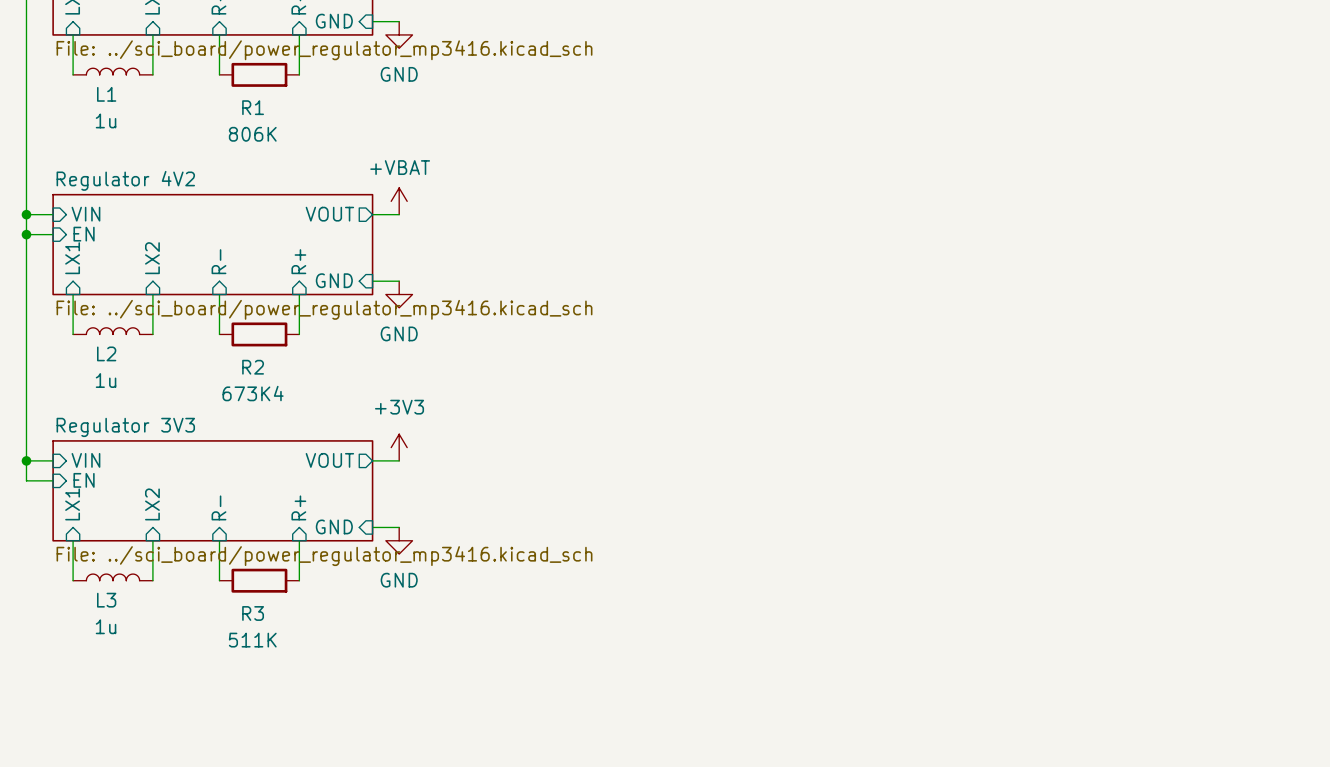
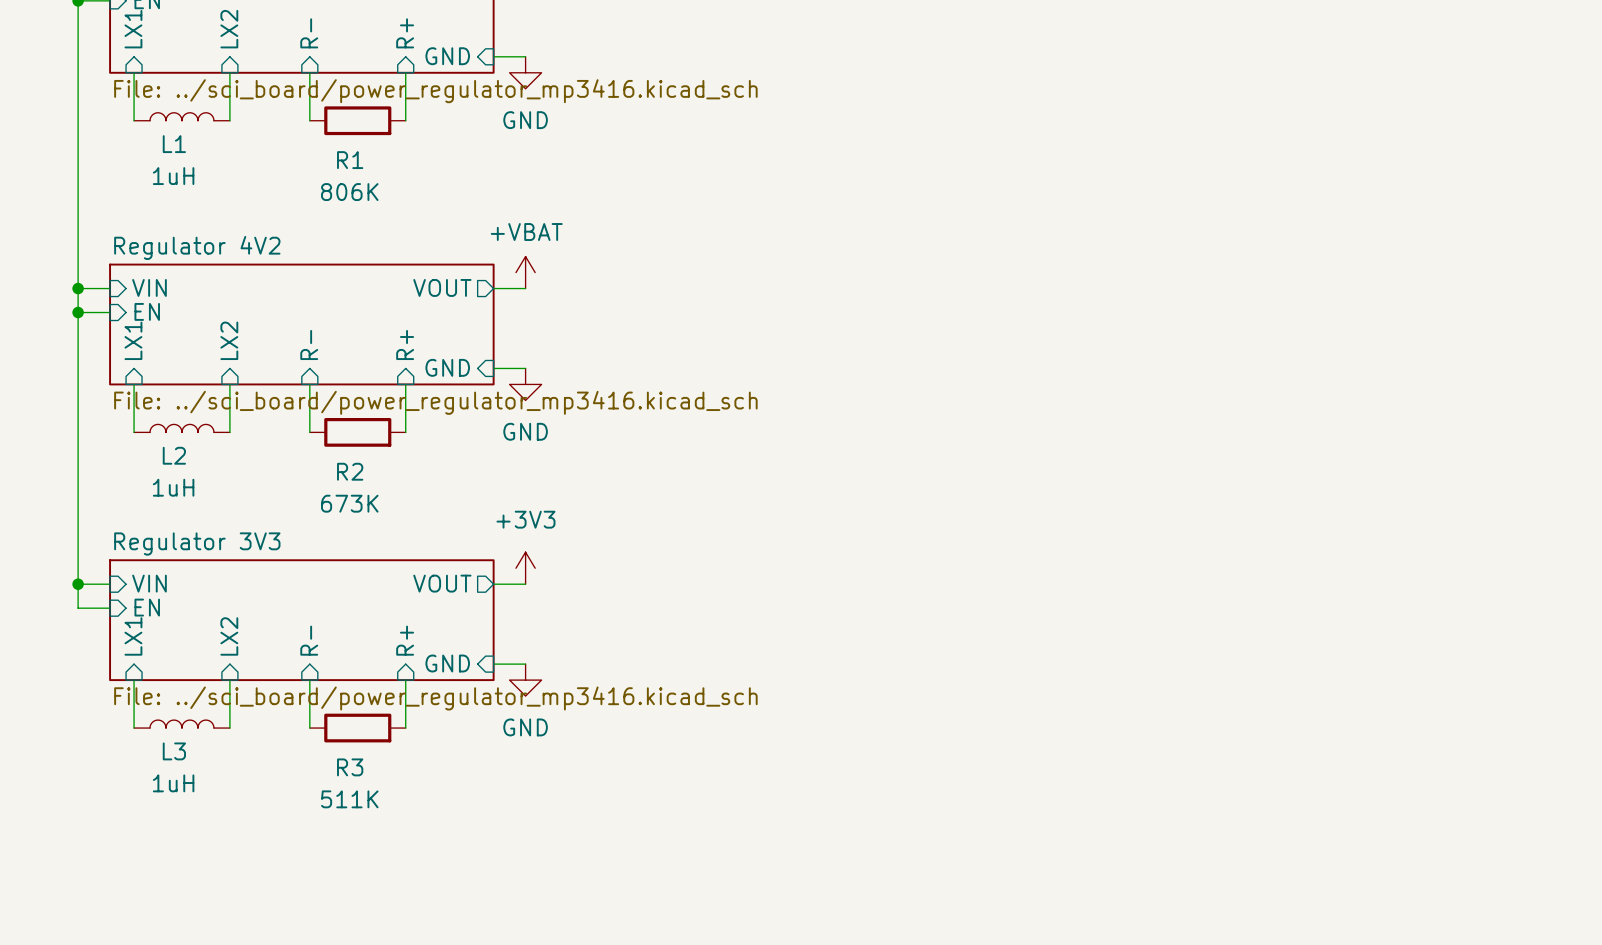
L1 value: 1u (106, 120) -> 1uH (173, 176)
L2 value: 1u (106, 380) -> 1uH (173, 487)
R2 value: 673K4 (253, 393) -> 673K (349, 503)
L3 value: 1u (106, 626) -> 1uH (173, 783)

